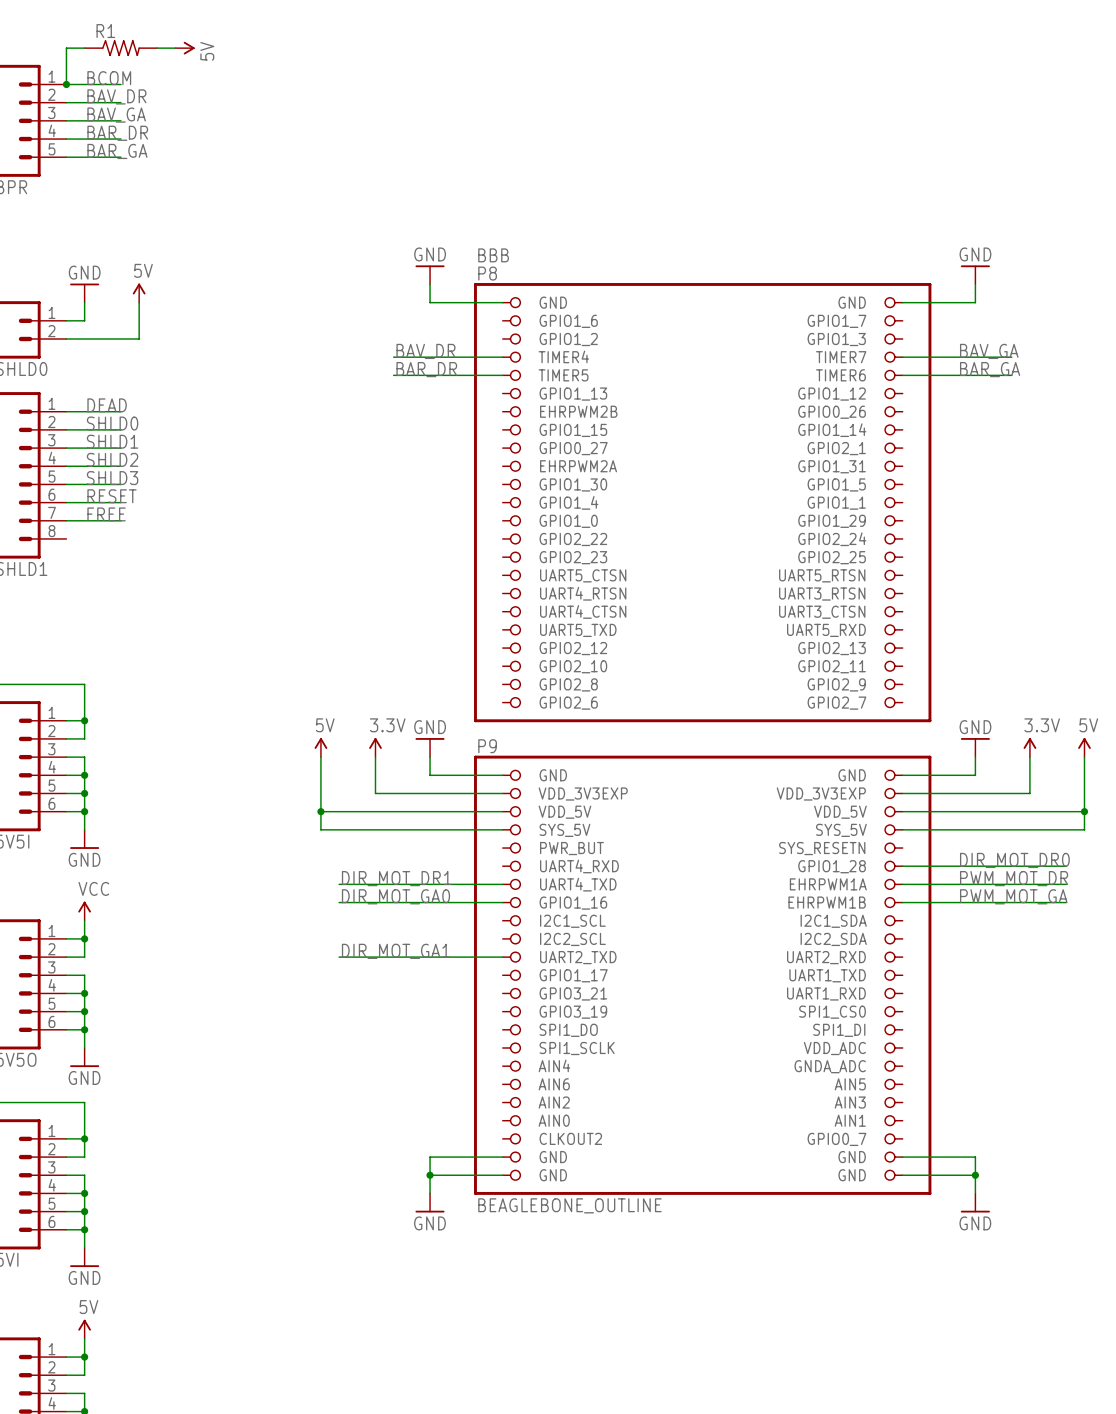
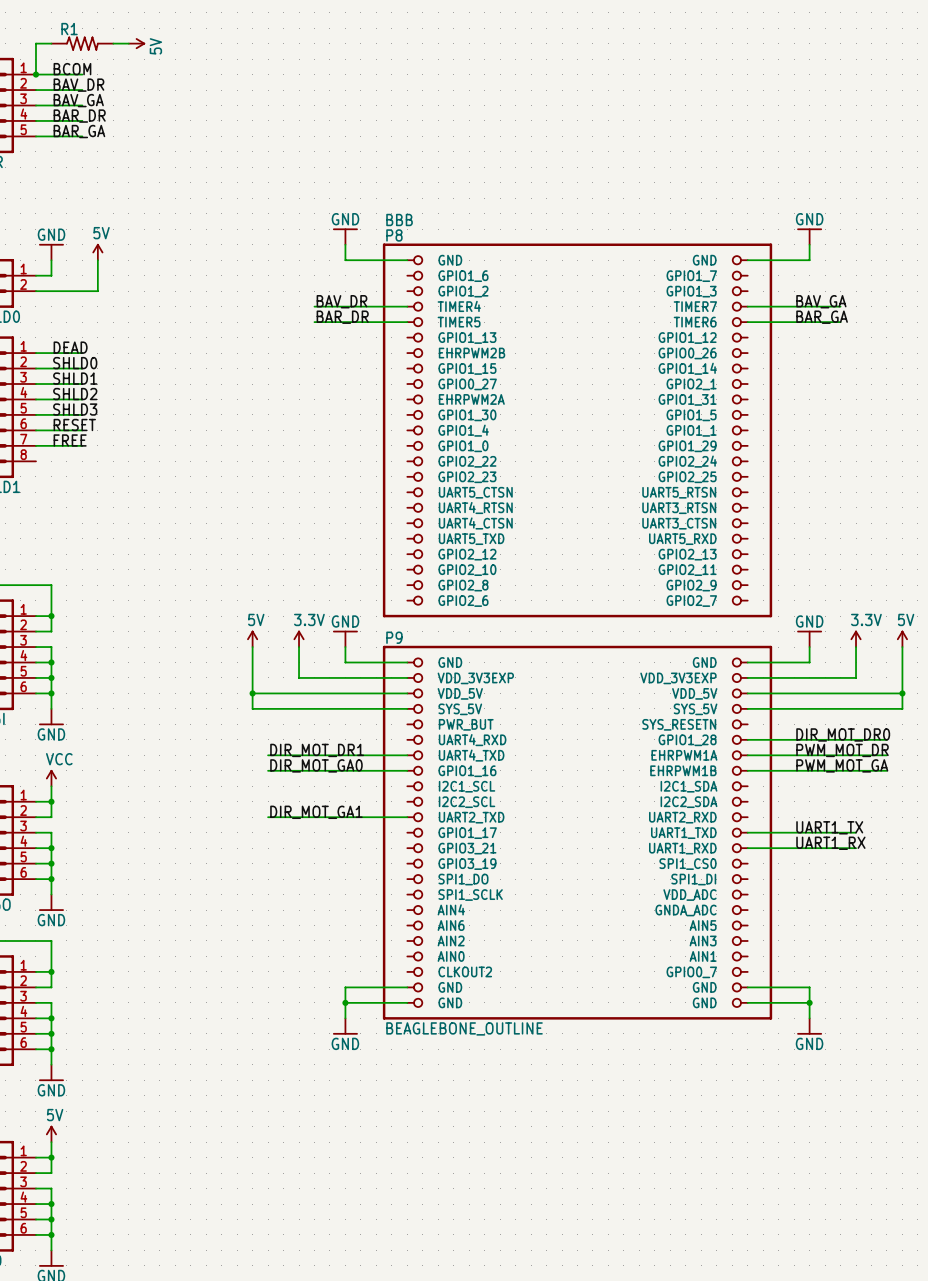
label: none -> UART1_TX (829, 827)
wire: none -> (747, 832) (856, 832)
label: none -> UART1_RX (830, 843)
wire: none -> (747, 848) (856, 848)

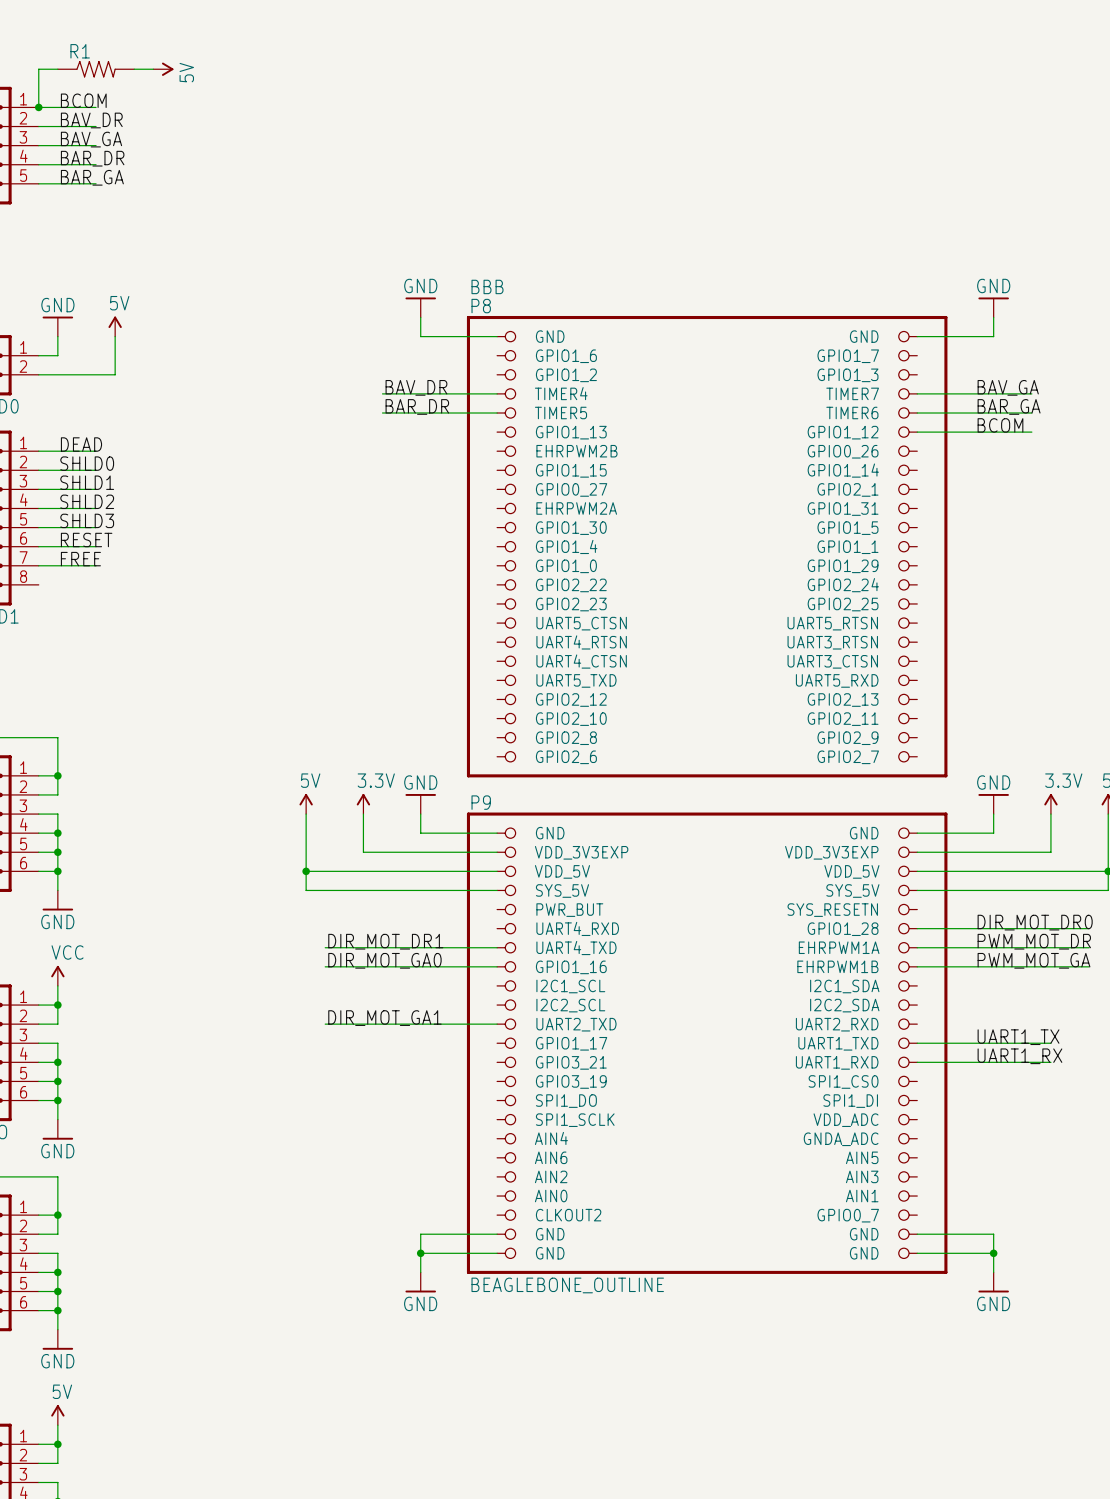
label: none -> BCOM (1000, 425)
wire: none -> (917, 432) (1031, 432)

